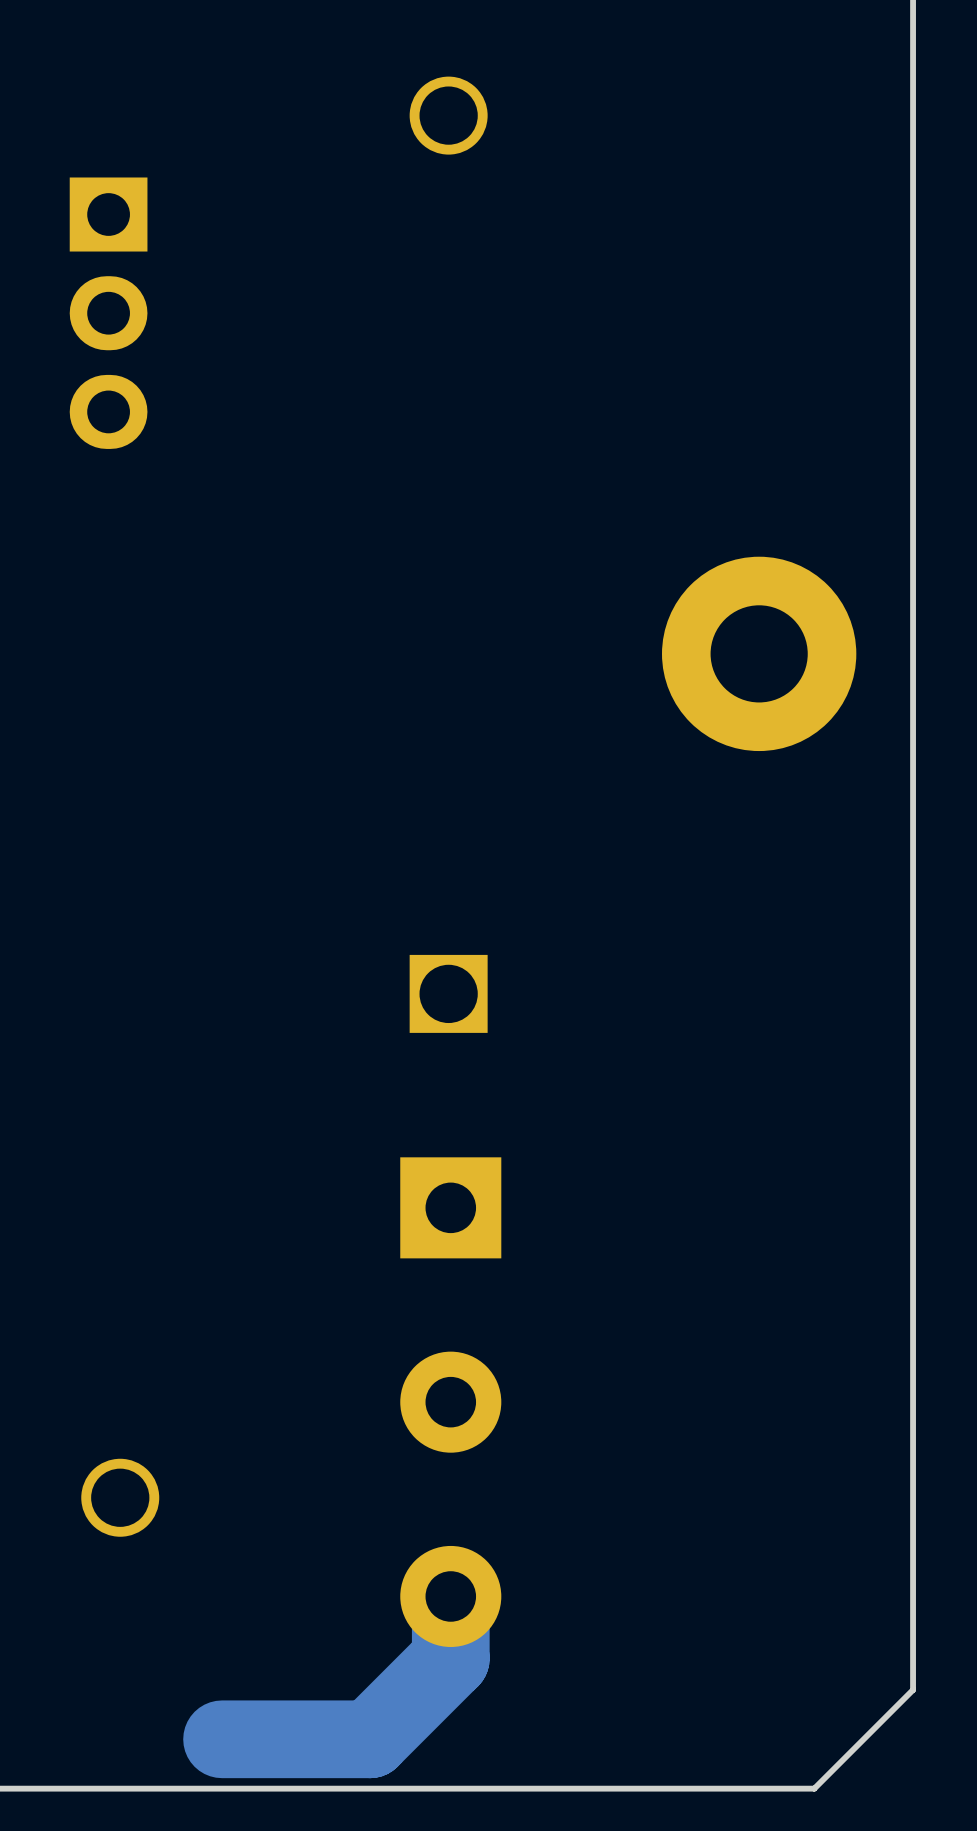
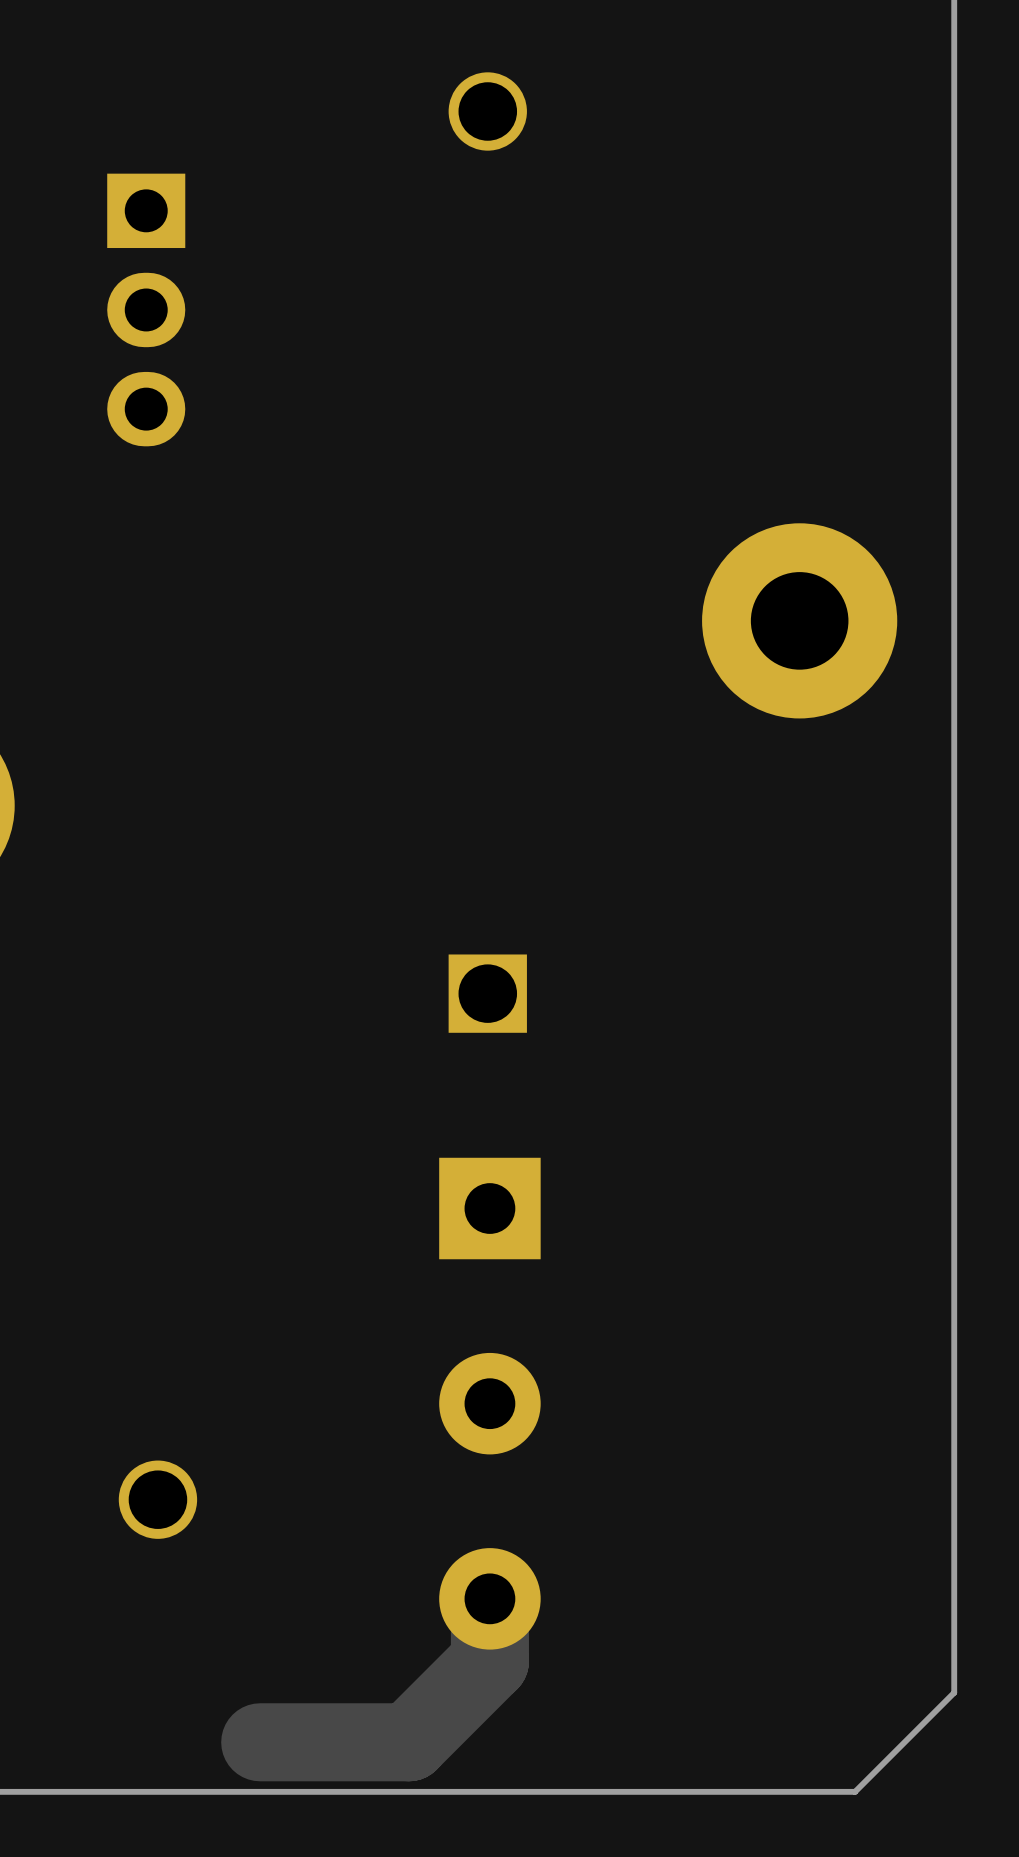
part position: (759, 653) -> (799, 620)

